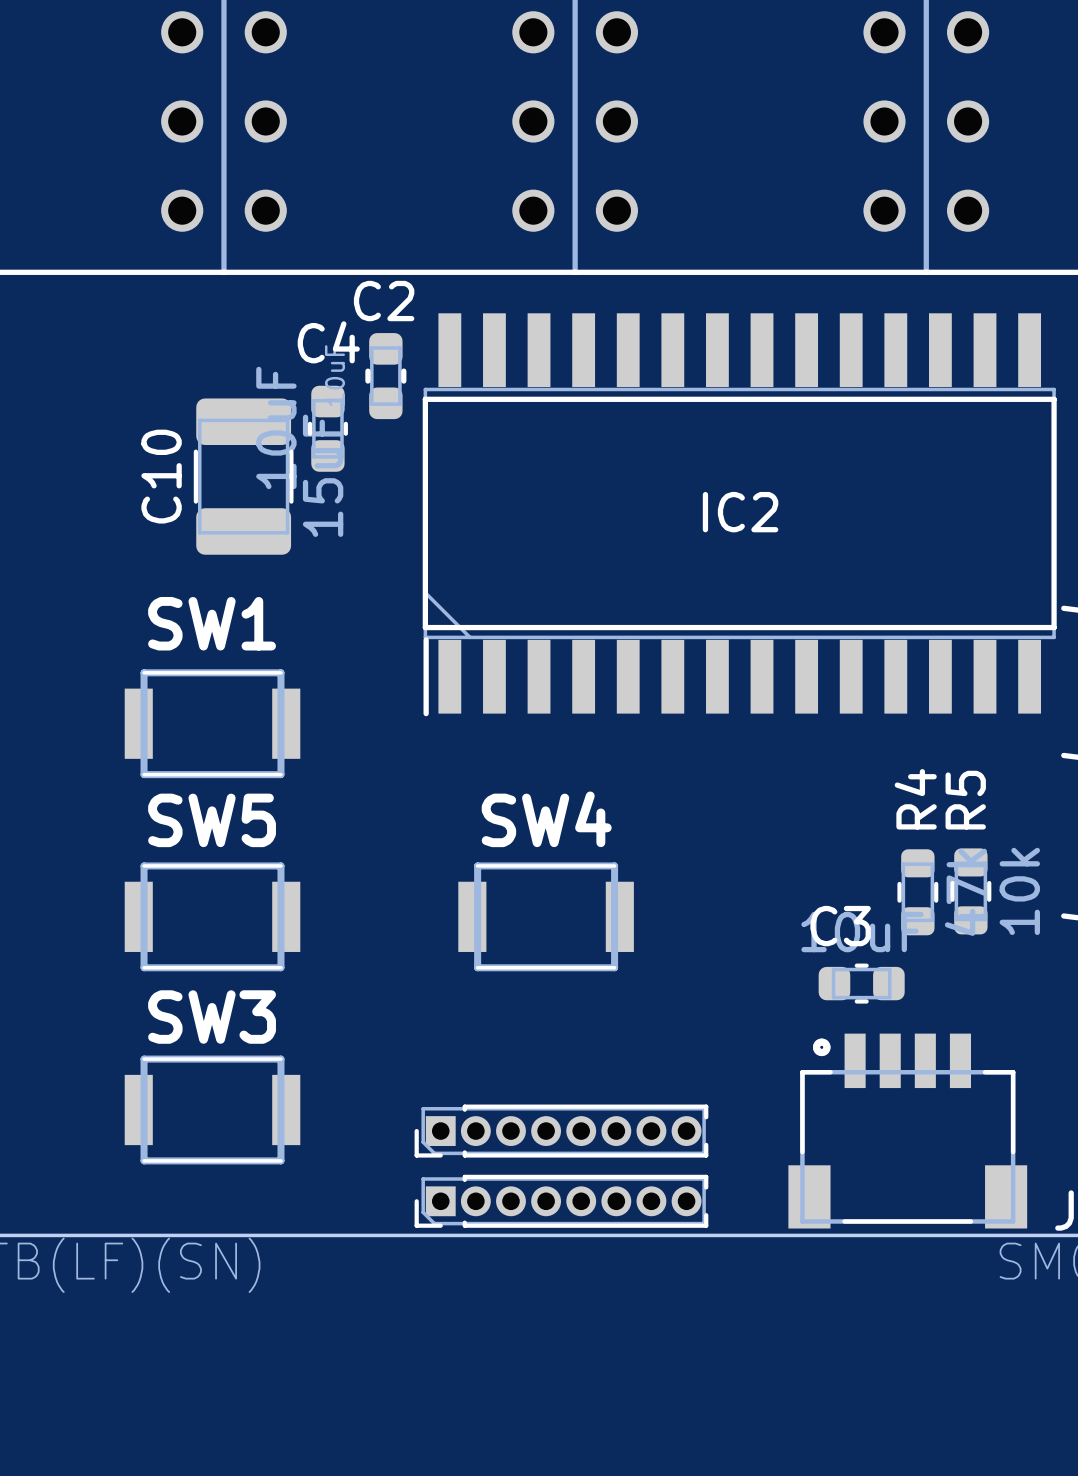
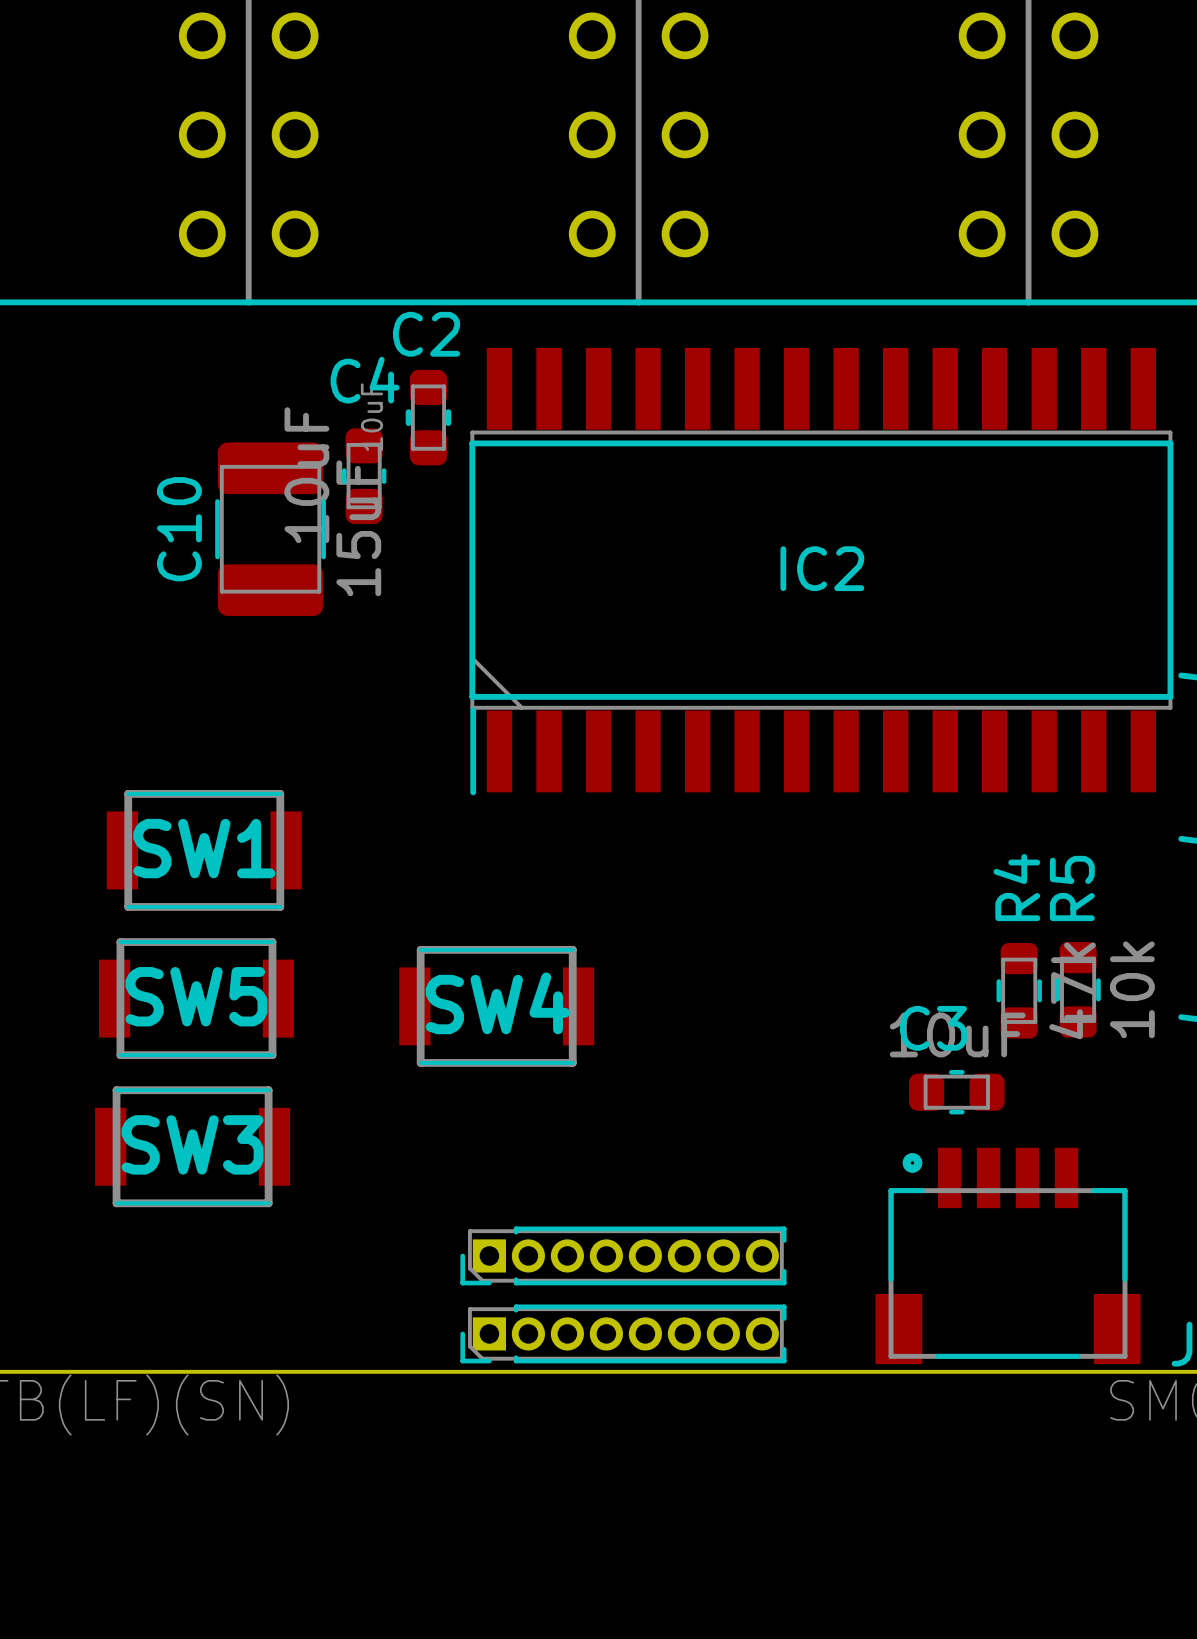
SW1 name position: SW1 (212, 623) -> SW1 (204, 848)
SW1 position: (212, 723) -> (204, 850)
SW4 name position: SW4 (546, 819) -> SW4 (497, 1003)
SW5 name position: SW5 (212, 820) -> SW5 (196, 996)
SW5 position: (212, 916) -> (196, 998)
SW4 position: (546, 916) -> (496, 1006)
SW3 name position: SW3 (212, 1017) -> SW3 (192, 1144)
SW3 position: (212, 1109) -> (192, 1146)

